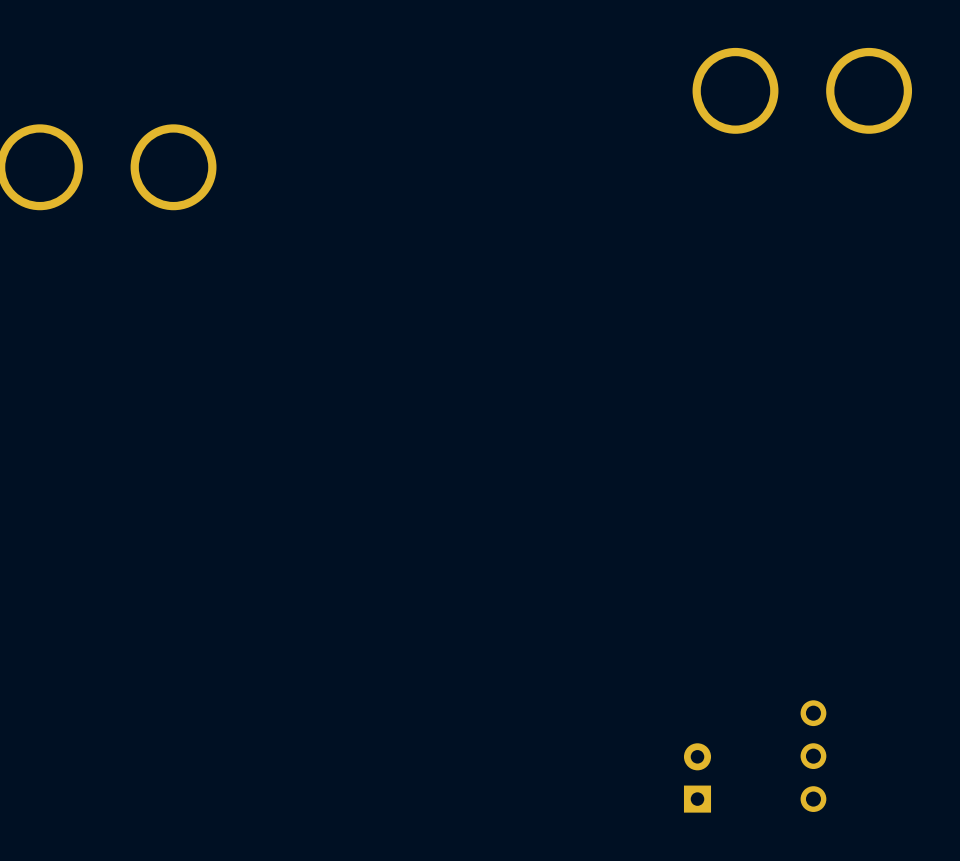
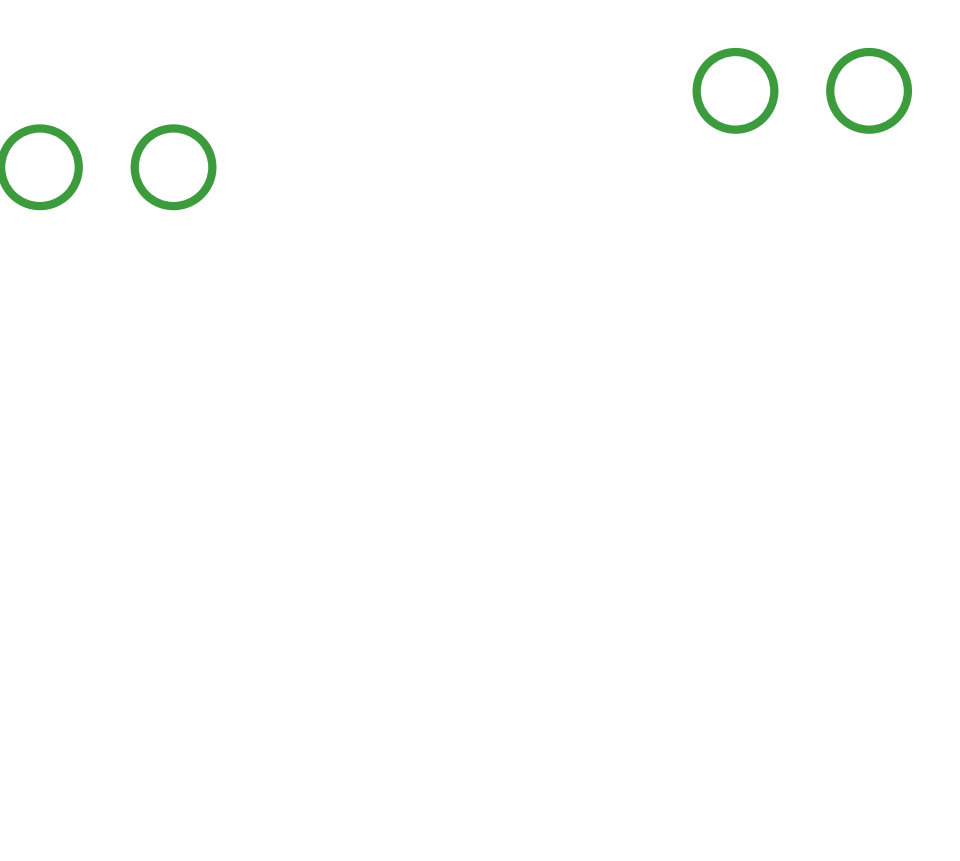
part: (813, 756) -> none
part: (697, 777) -> none

